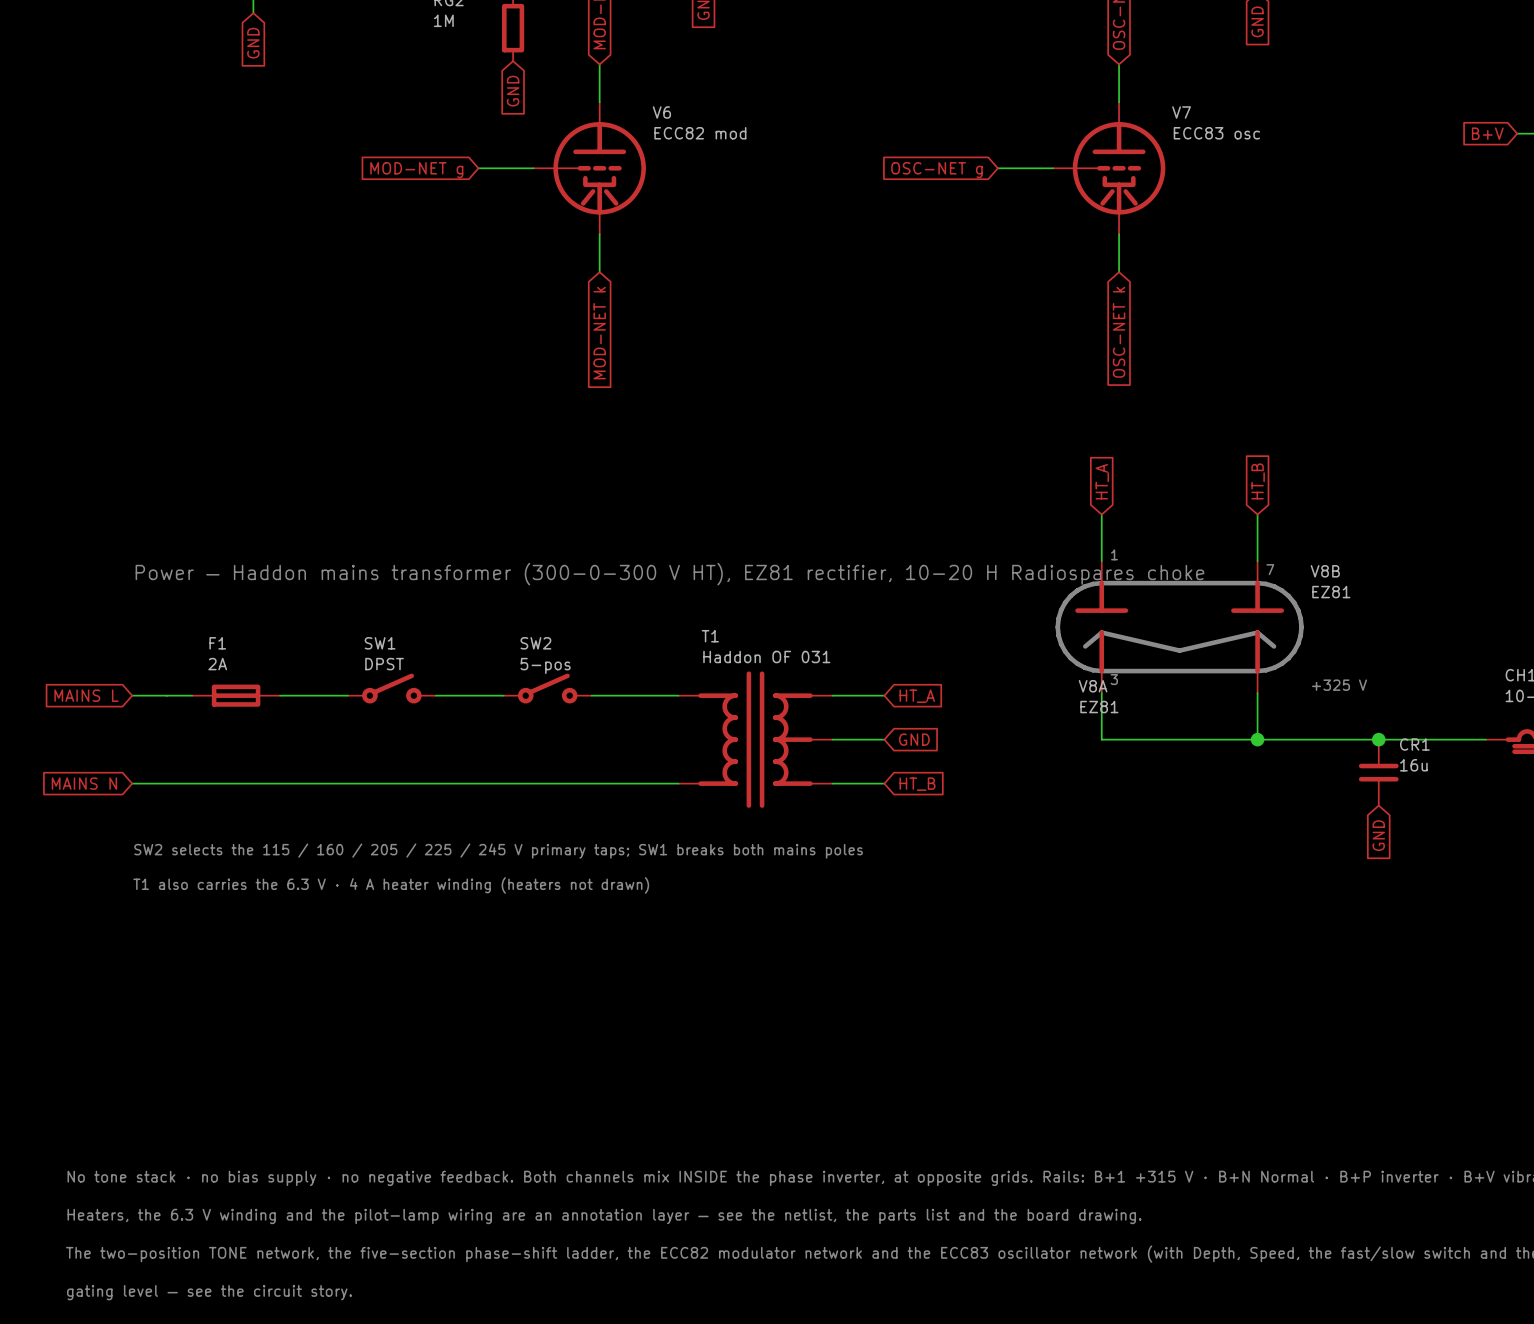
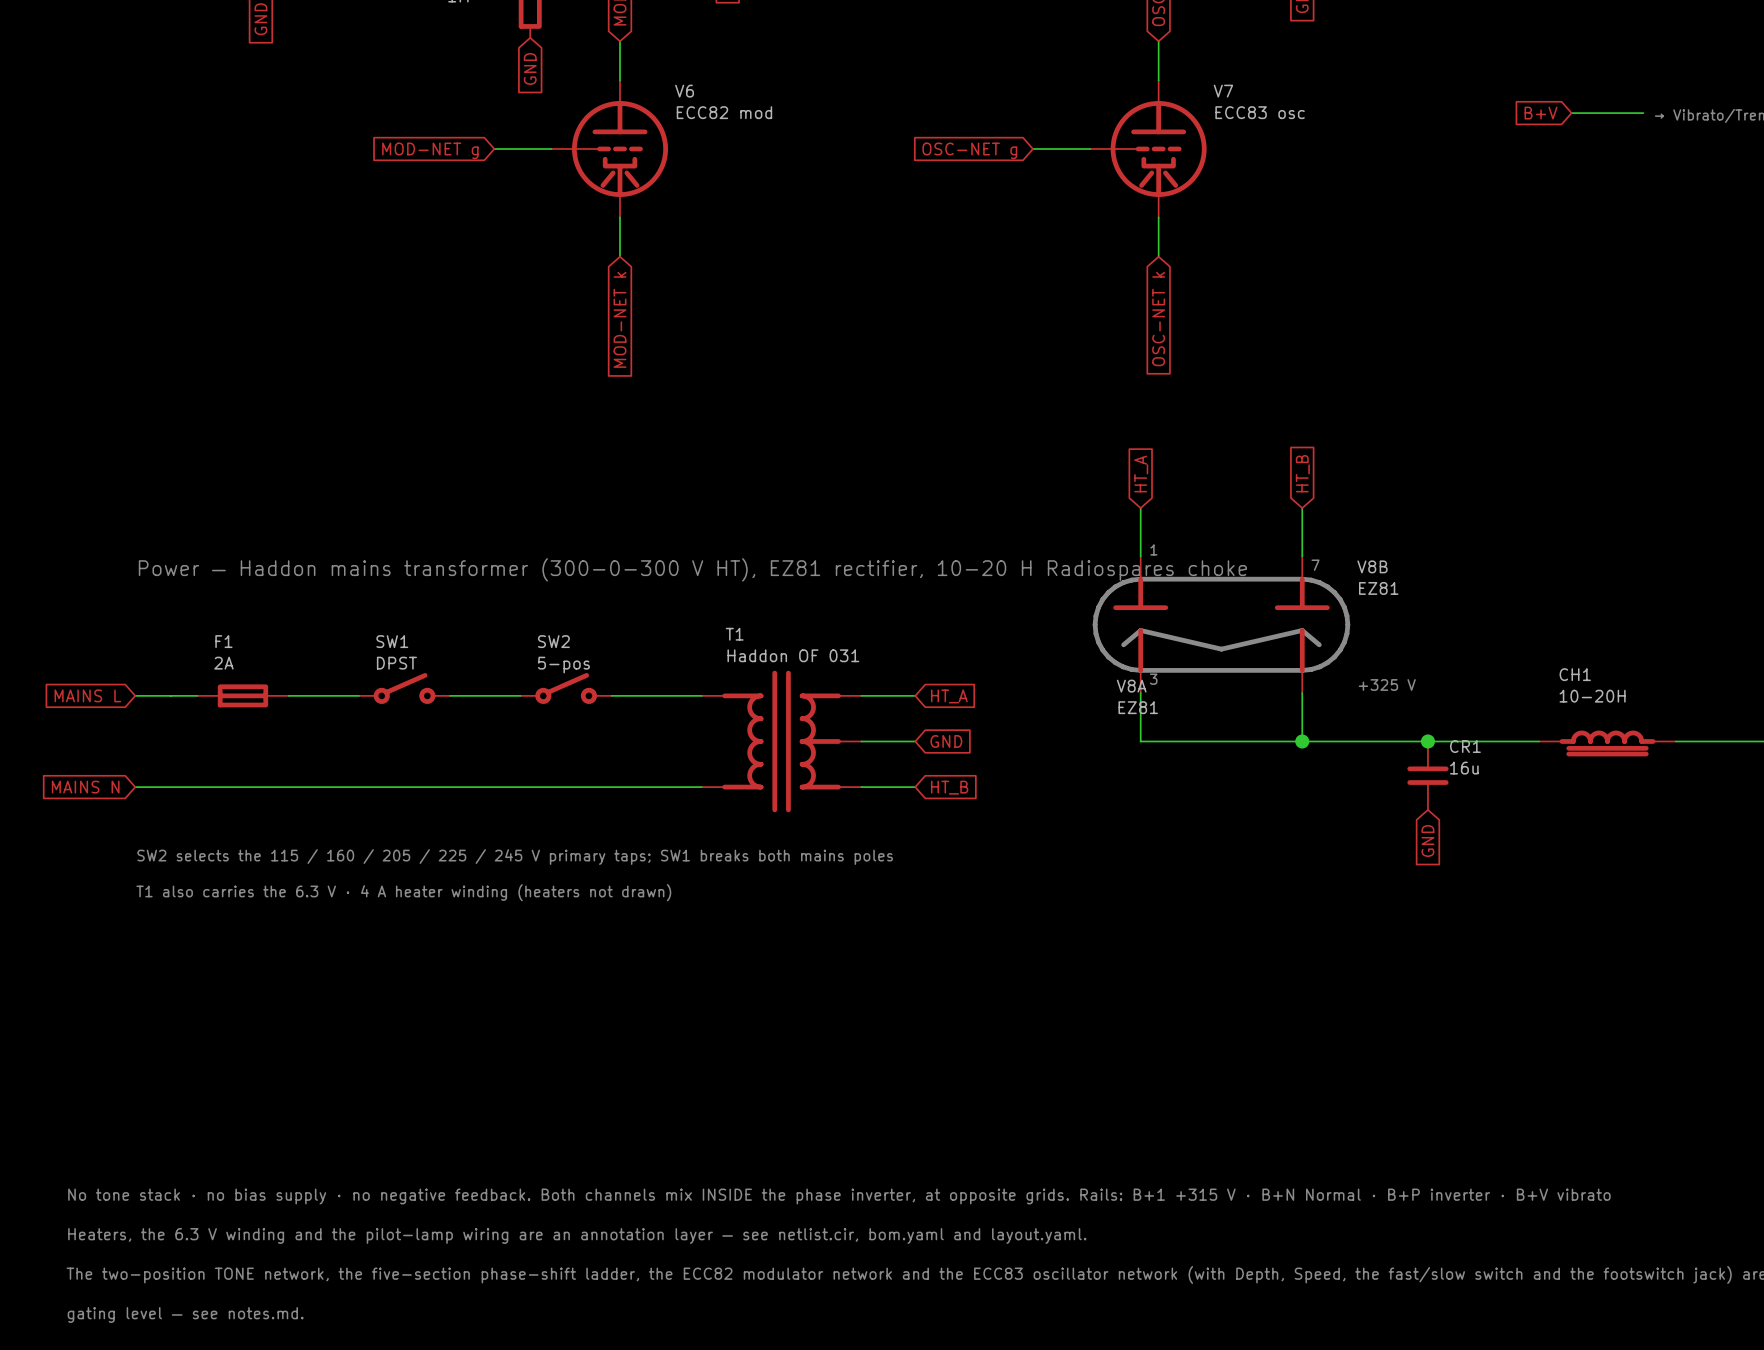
text: Heaters, the 6.3 V winding and the pilot-lamp wiring are an annotation layer — see the netlist, the parts list and the board drawing. (604, 1216) -> Heaters, the 6.3 V winding and the pilot-lamp wiring are an annotation layer — see netlist.cir, bom.yaml and layout.yaml. (577, 1235)
text: gating level — see the circuit story. (209, 1292) -> gating level — see notes.md. (185, 1314)

